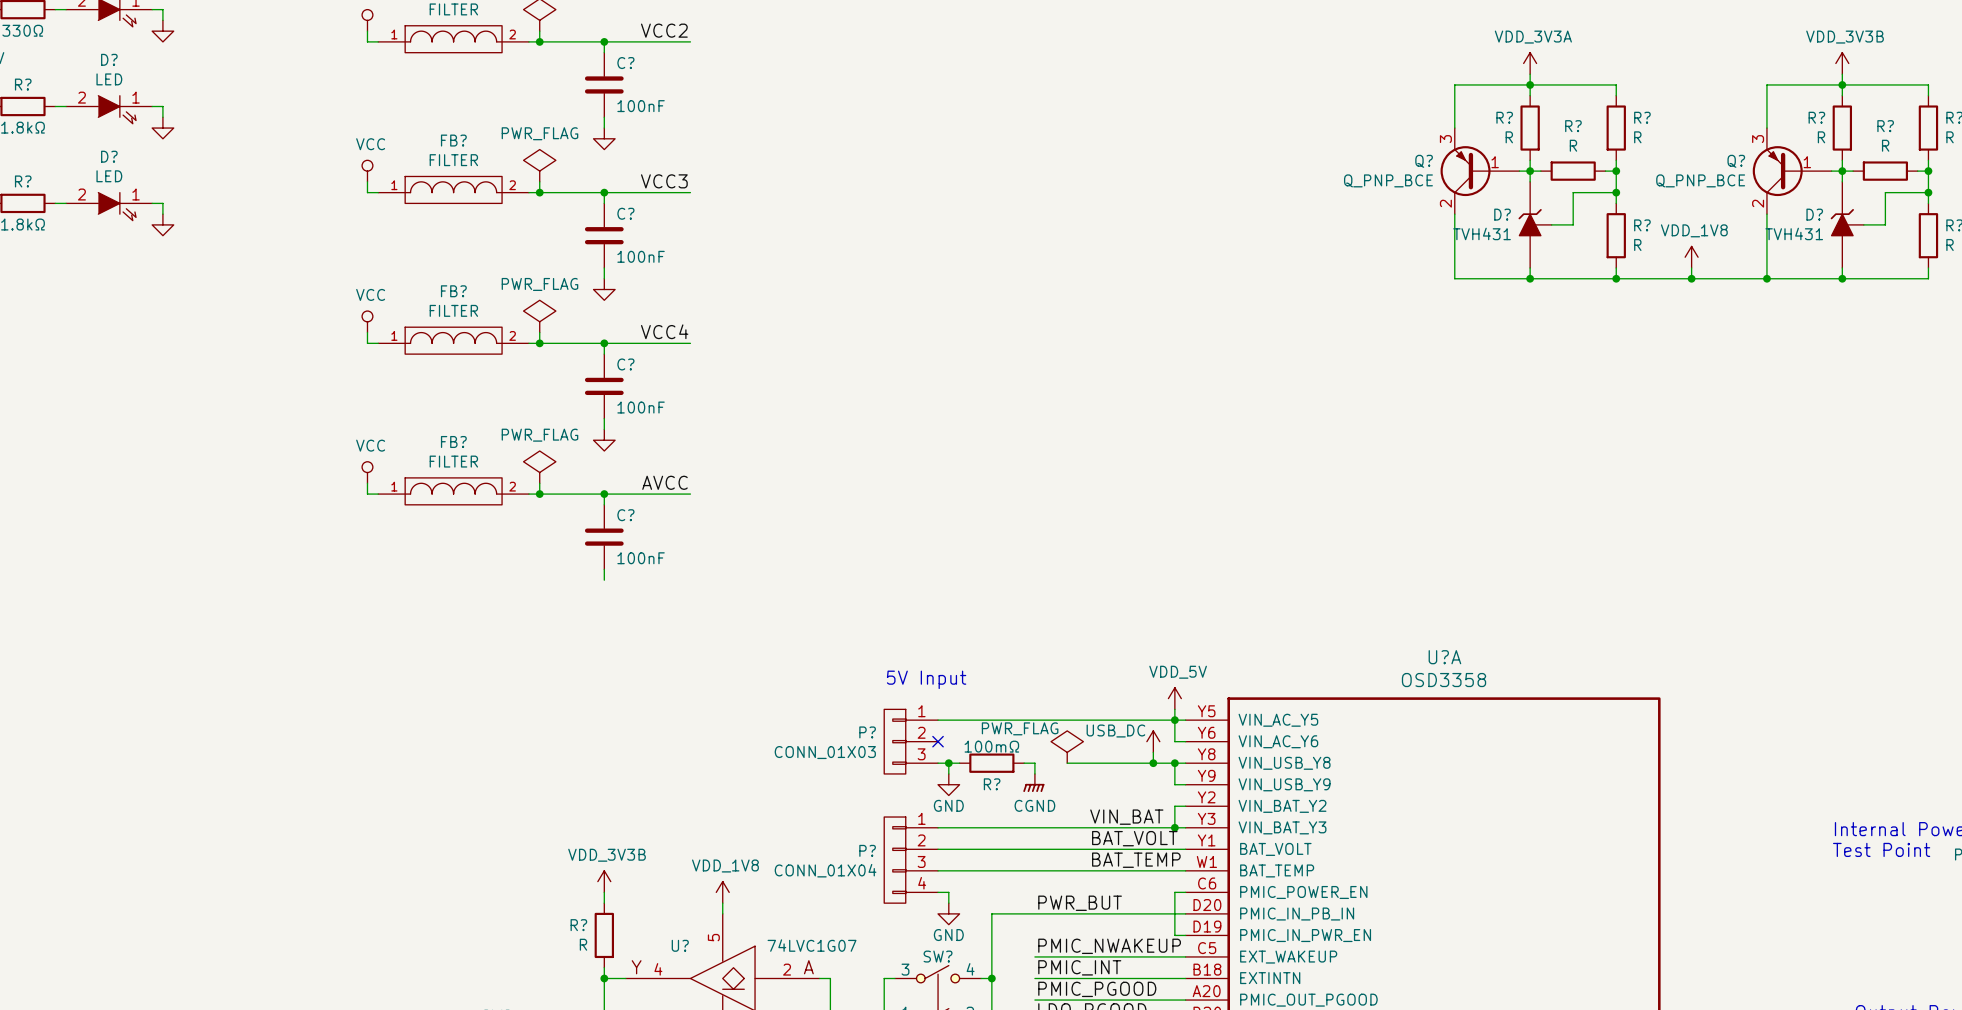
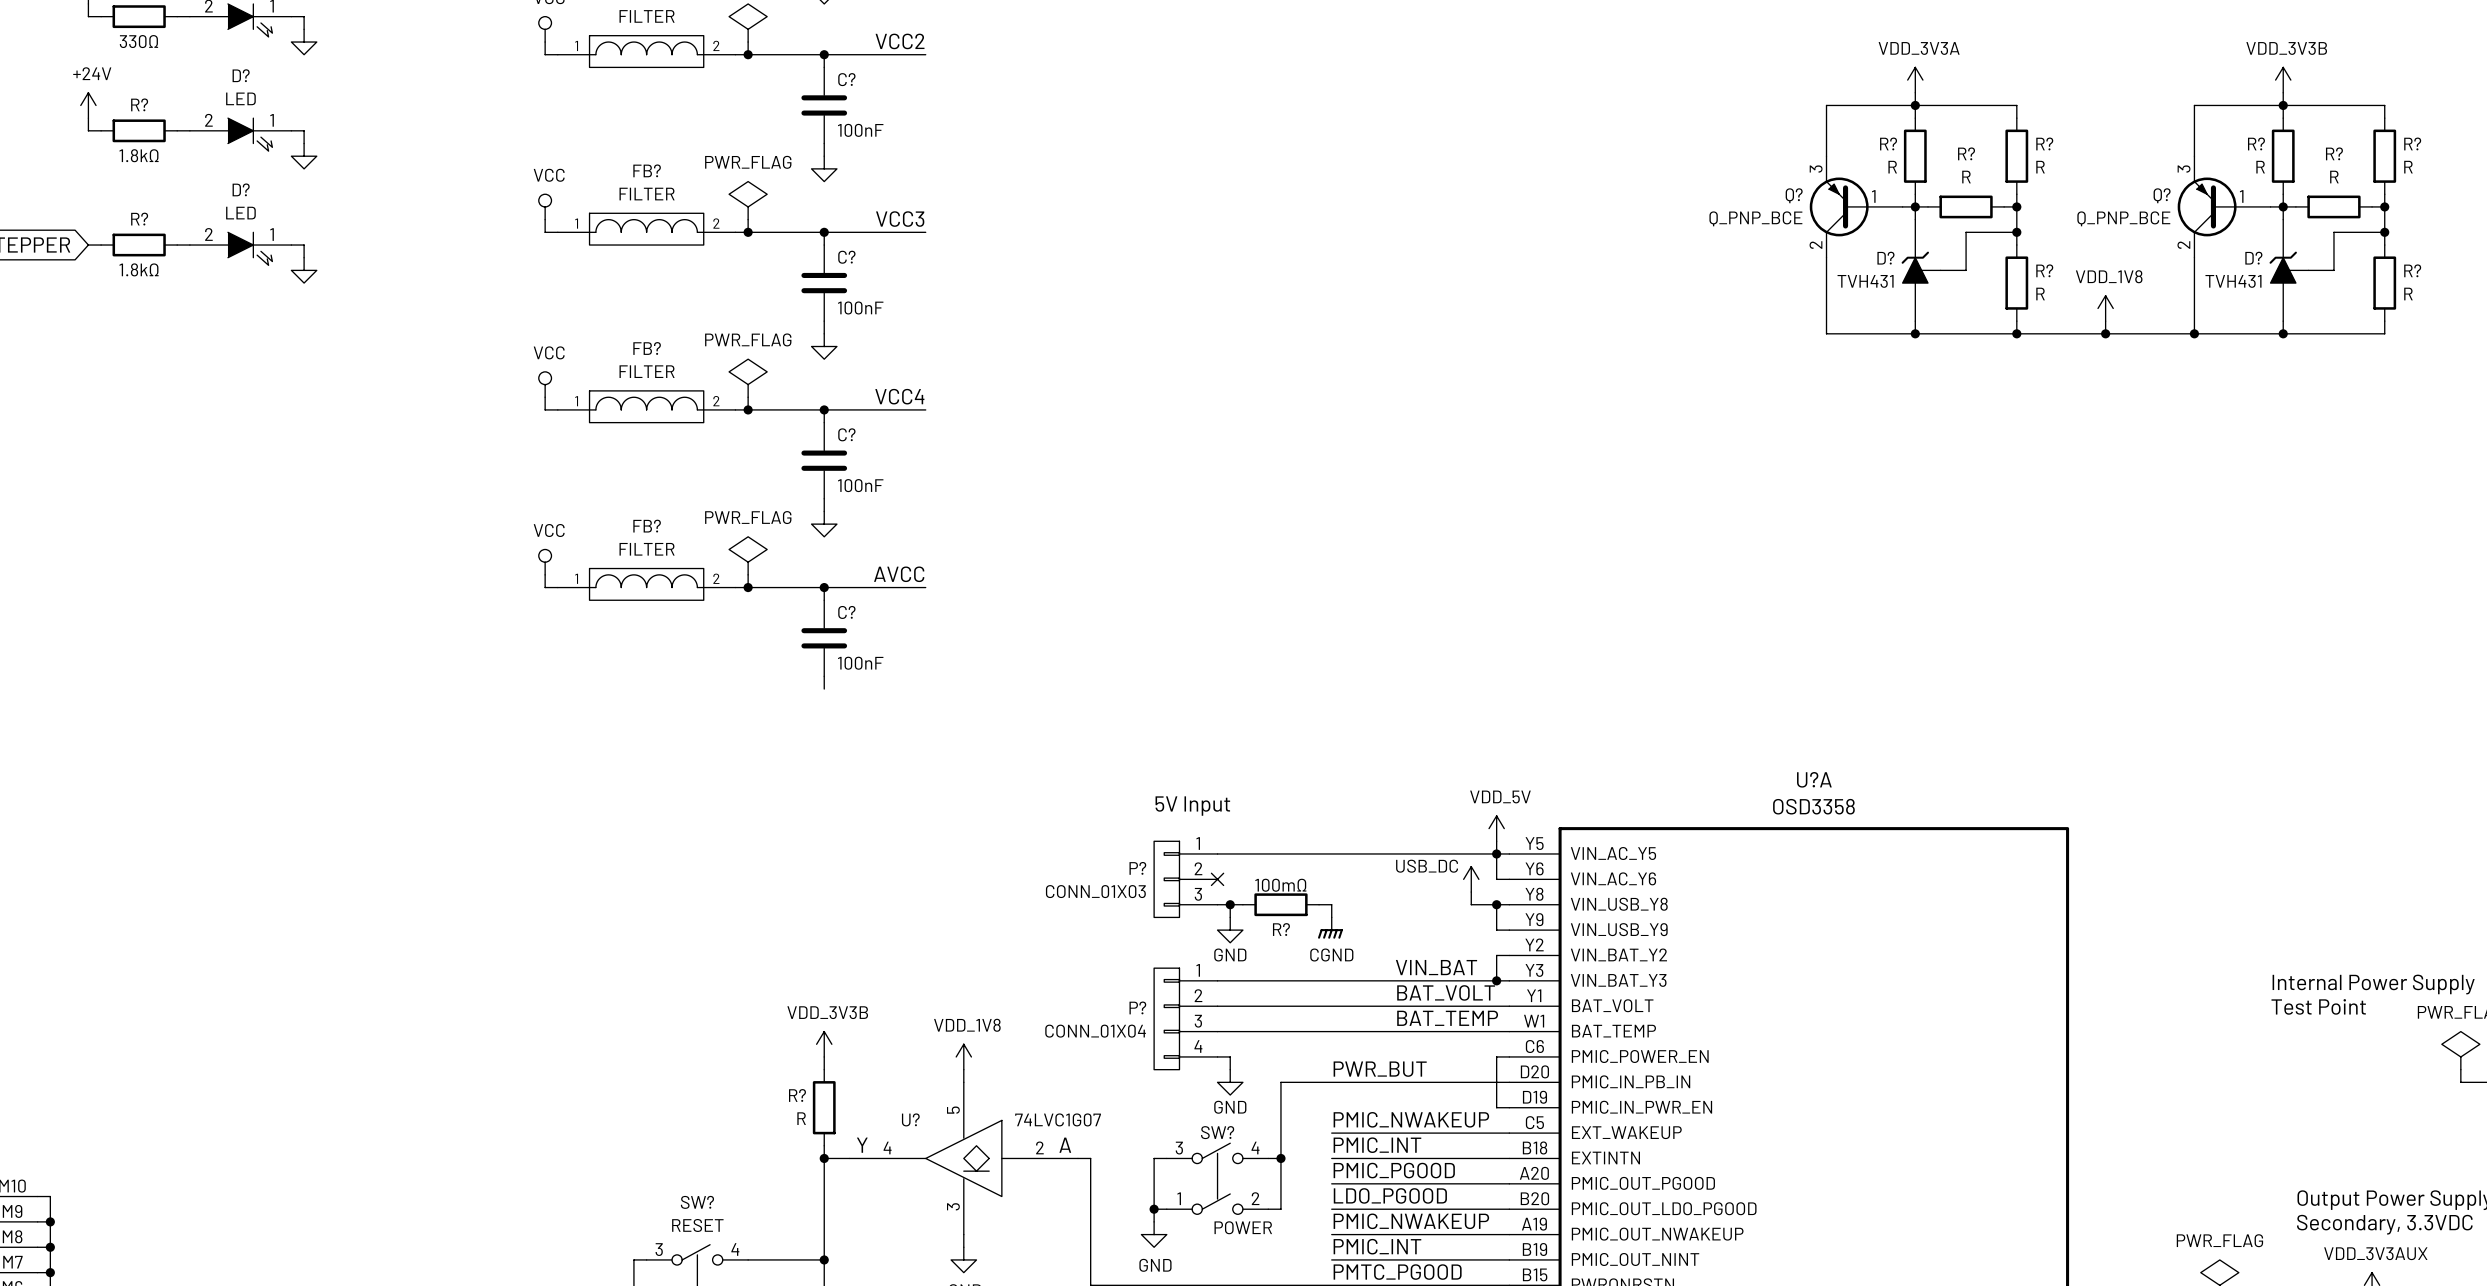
power symbol: PWR_FLAG (1067, 747) -> none
wire: (1067, 763) (1153, 763) -> none
junction: (1153, 763) -> none

